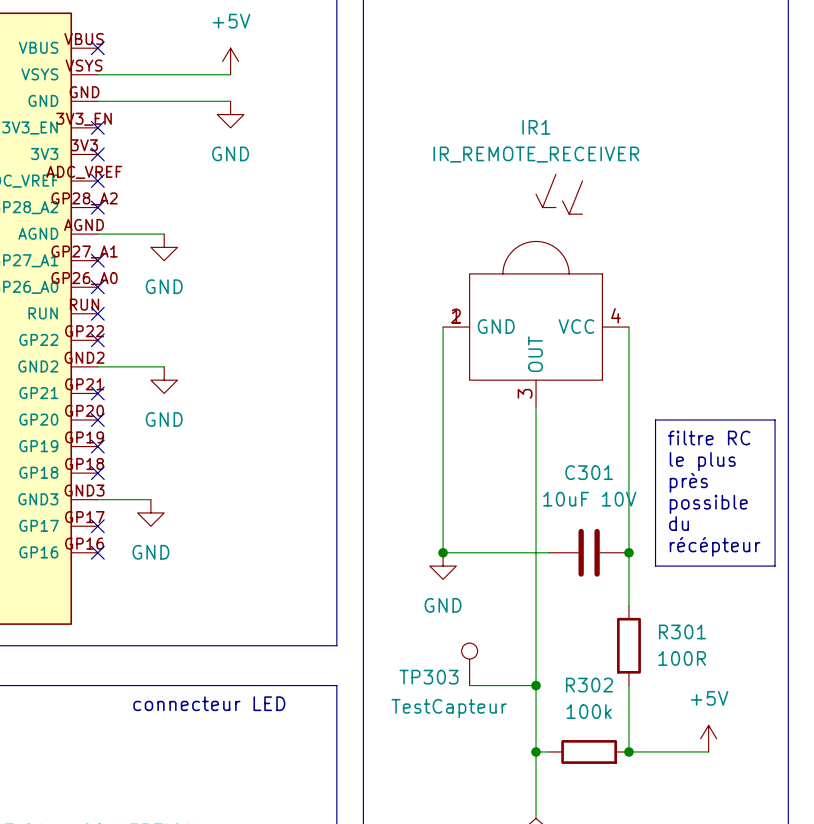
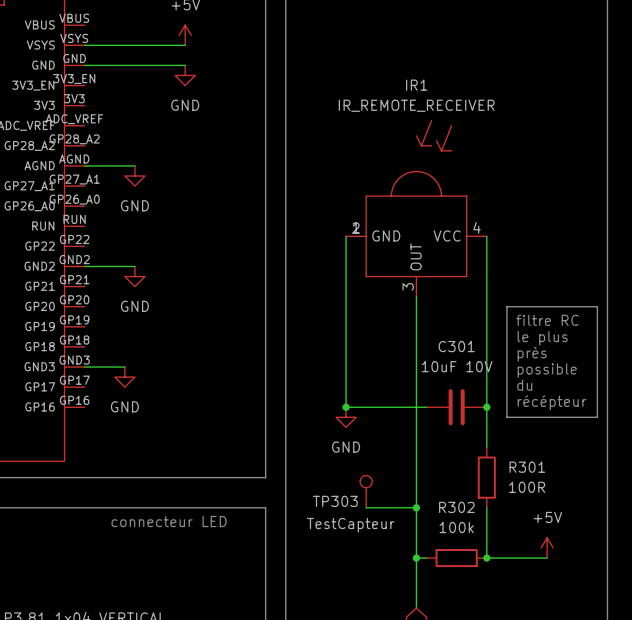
no-connect mark: (97, 48) -> none
no-connect mark: (97, 127) -> none
no-connect mark: (97, 154) -> none
no-connect mark: (97, 180) -> none
no-connect mark: (97, 207) -> none
no-connect mark: (97, 260) -> none
no-connect mark: (97, 287) -> none
no-connect mark: (97, 313) -> none
no-connect mark: (97, 340) -> none
no-connect mark: (97, 393) -> none
no-connect mark: (97, 420) -> none
no-connect mark: (97, 446) -> none
no-connect mark: (97, 473) -> none
no-connect mark: (97, 526) -> none
no-connect mark: (97, 552) -> none

